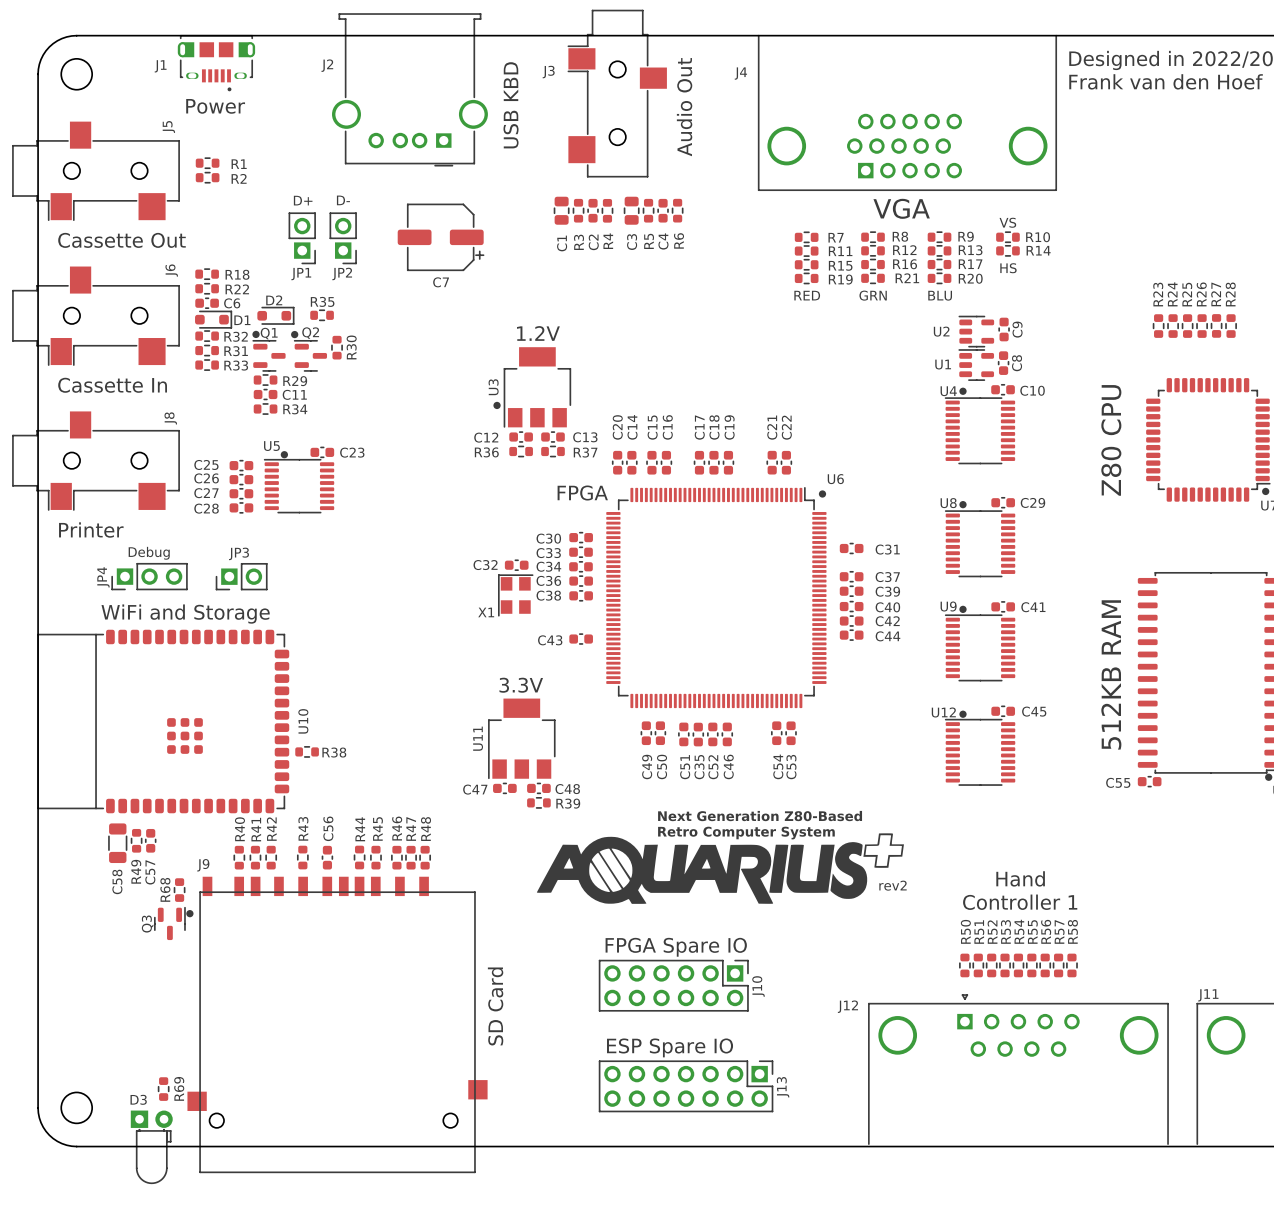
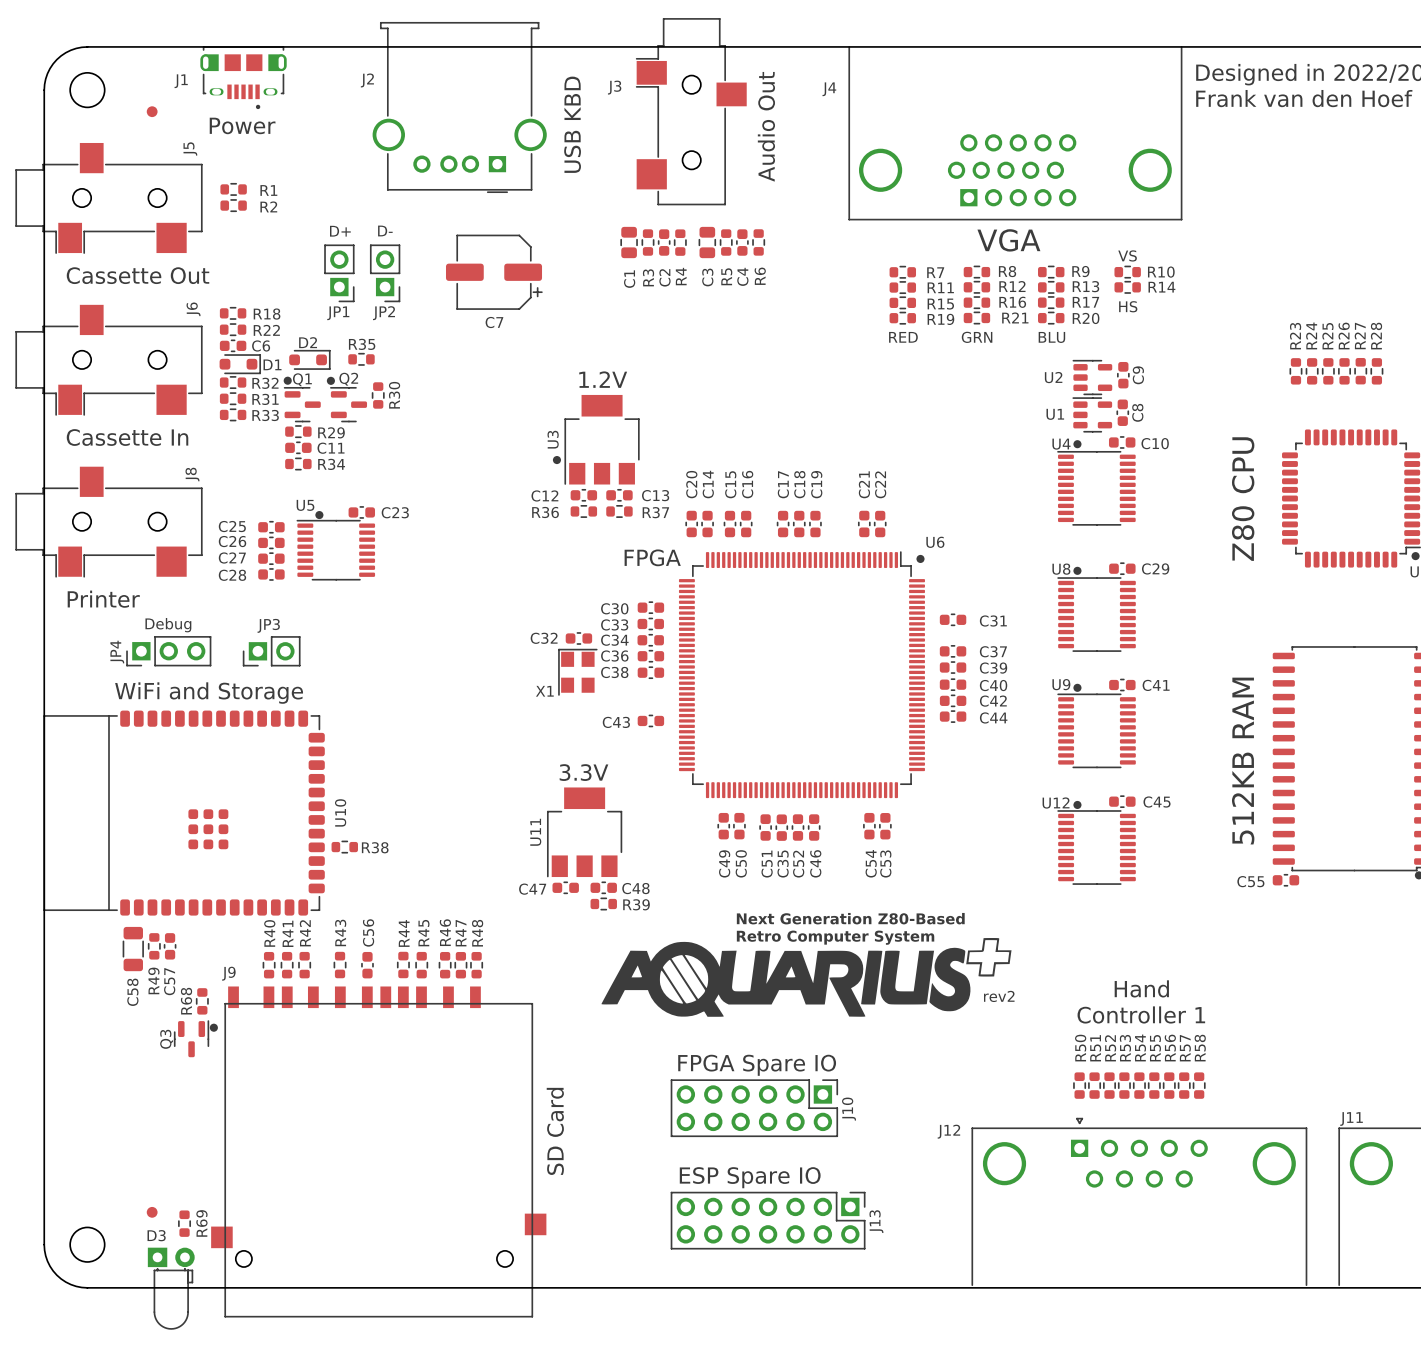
part: none -> (152, 111)
part: none -> (152, 1212)

